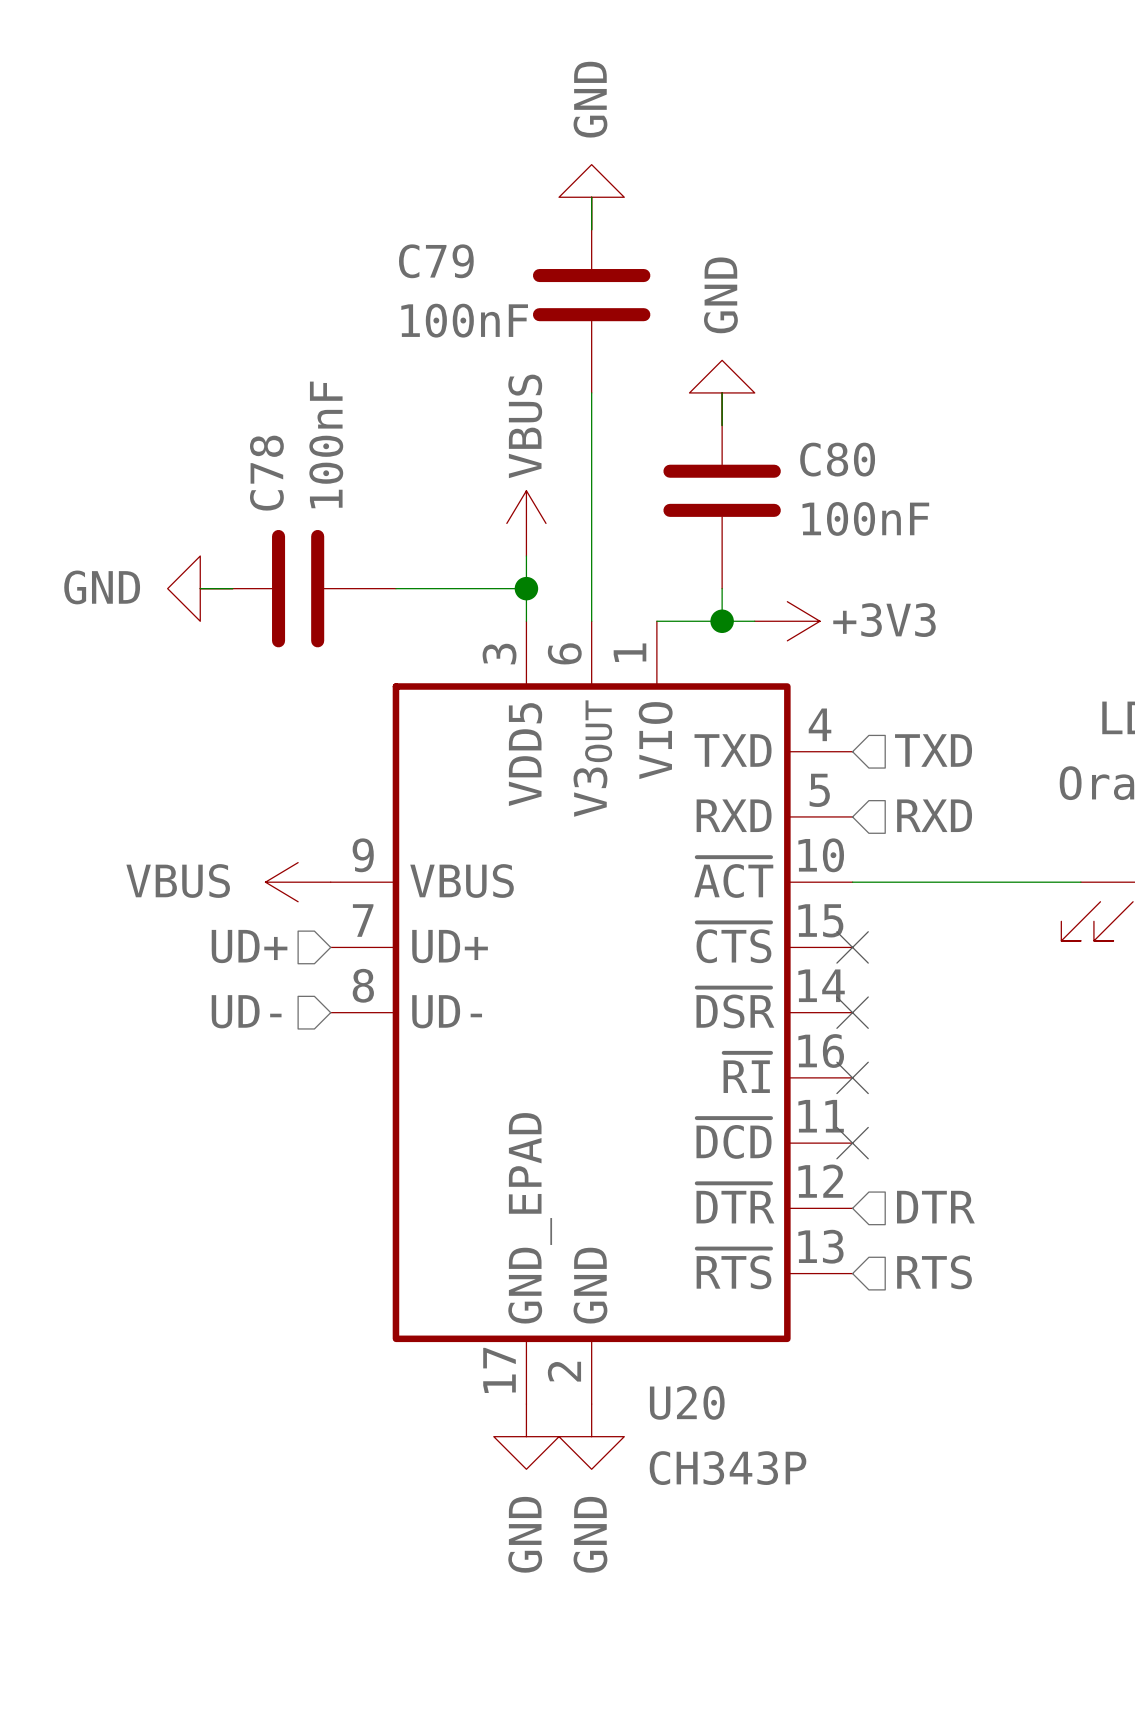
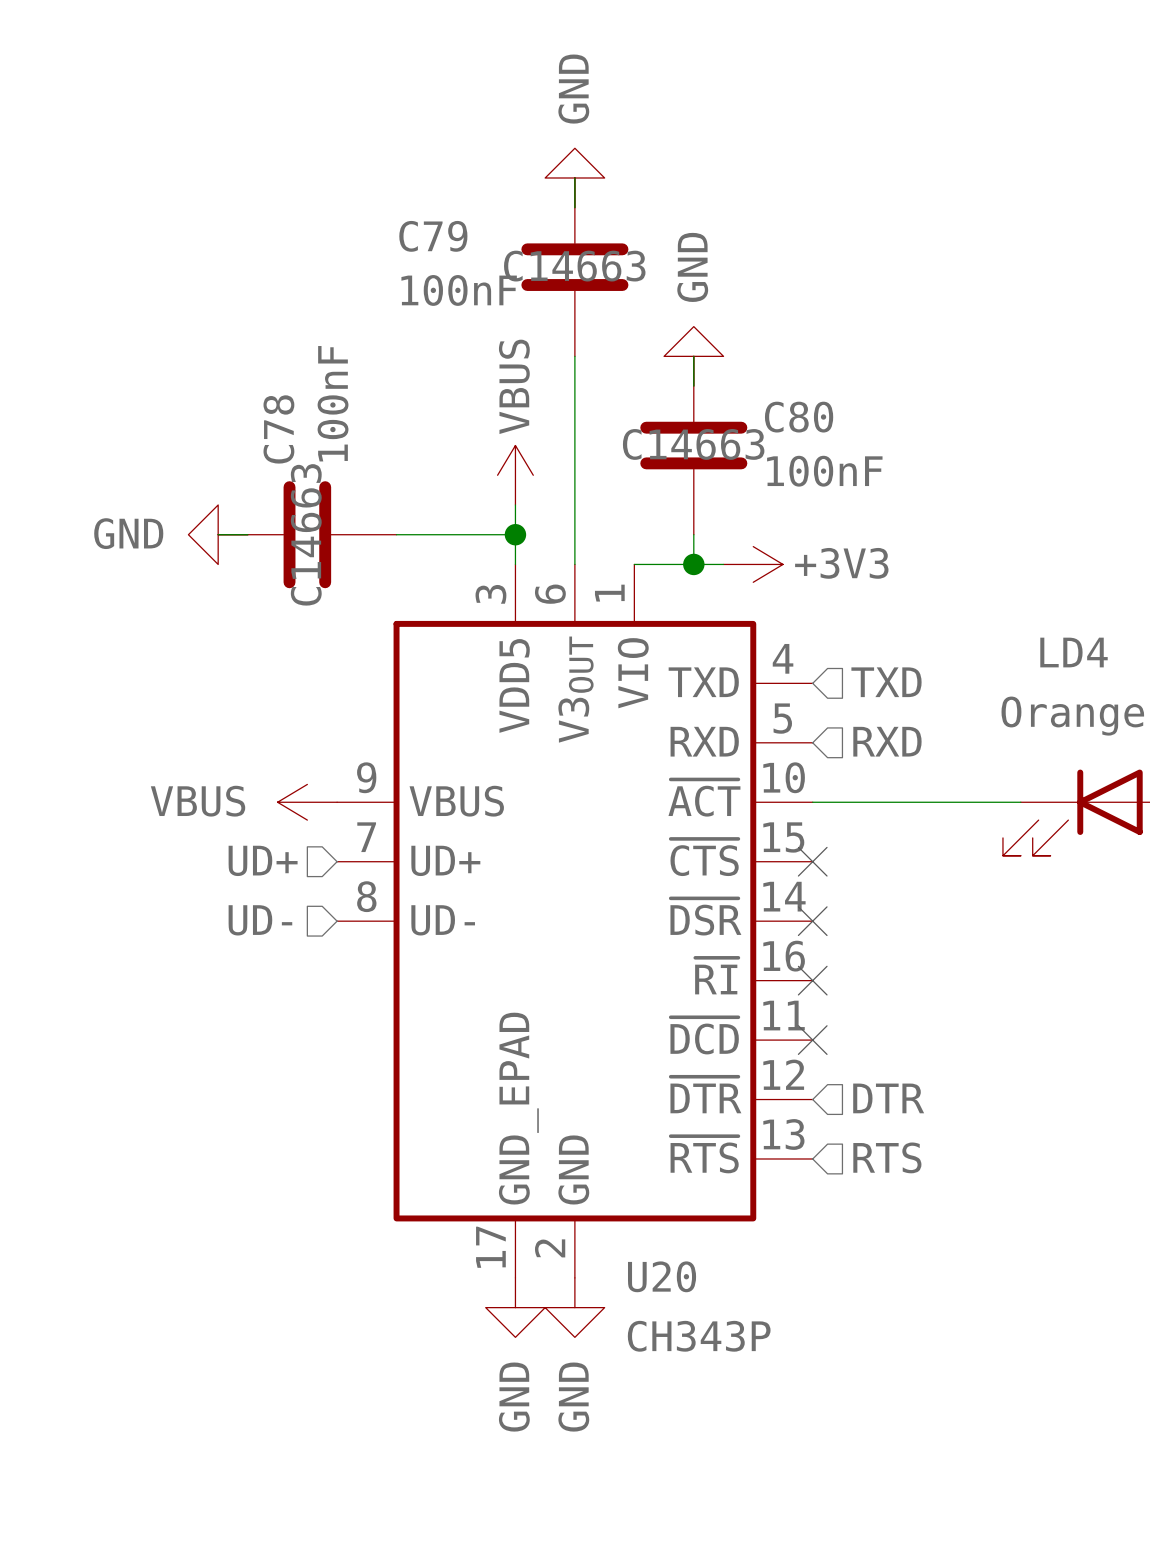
C79 text: none -> C14663 (574, 266)
C80 text: none -> C14663 (693, 444)
C78 text: none -> C14663 (306, 534)

